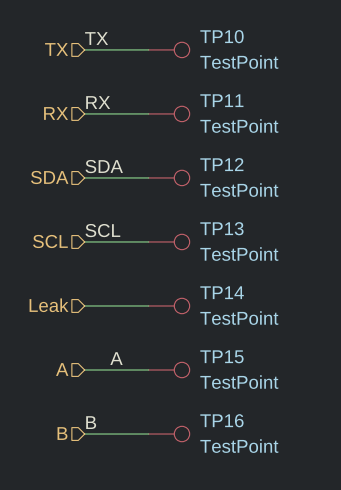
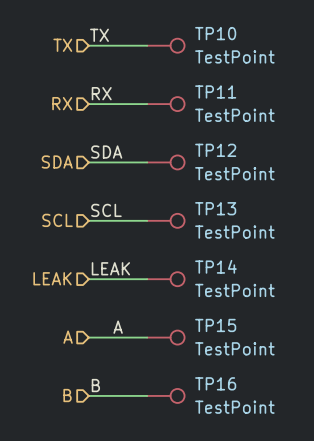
label: none -> LEAK (110, 268)
hierarchical label: Leak (49, 305) -> LEAK (52, 278)

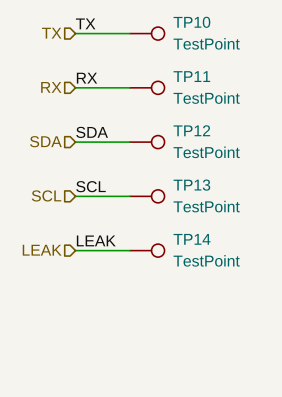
label: A (118, 327) -> none
hierarchical label: A (68, 337) -> none
wire: (88, 337) (147, 337) -> none
TP15: TestPoint (165, 337) -> none
label: B (95, 385) -> none
hierarchical label: B (67, 395) -> none
wire: (88, 395) (147, 395) -> none
TP16: TestPoint (165, 395) -> none

